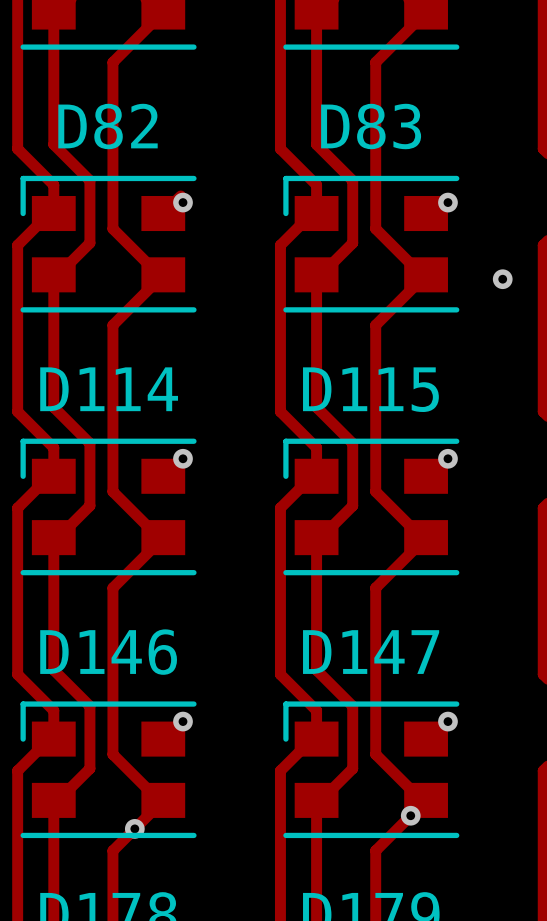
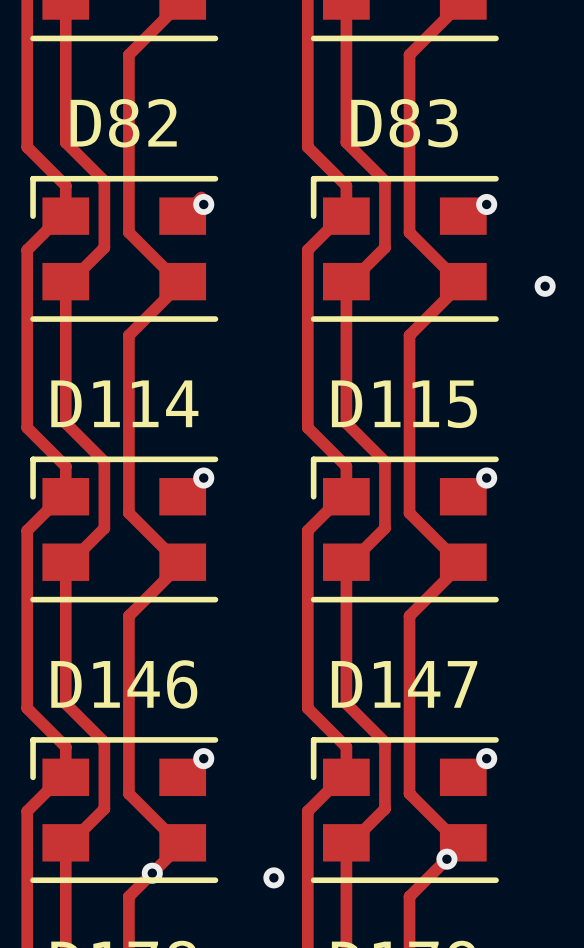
via: none -> (273, 877)

